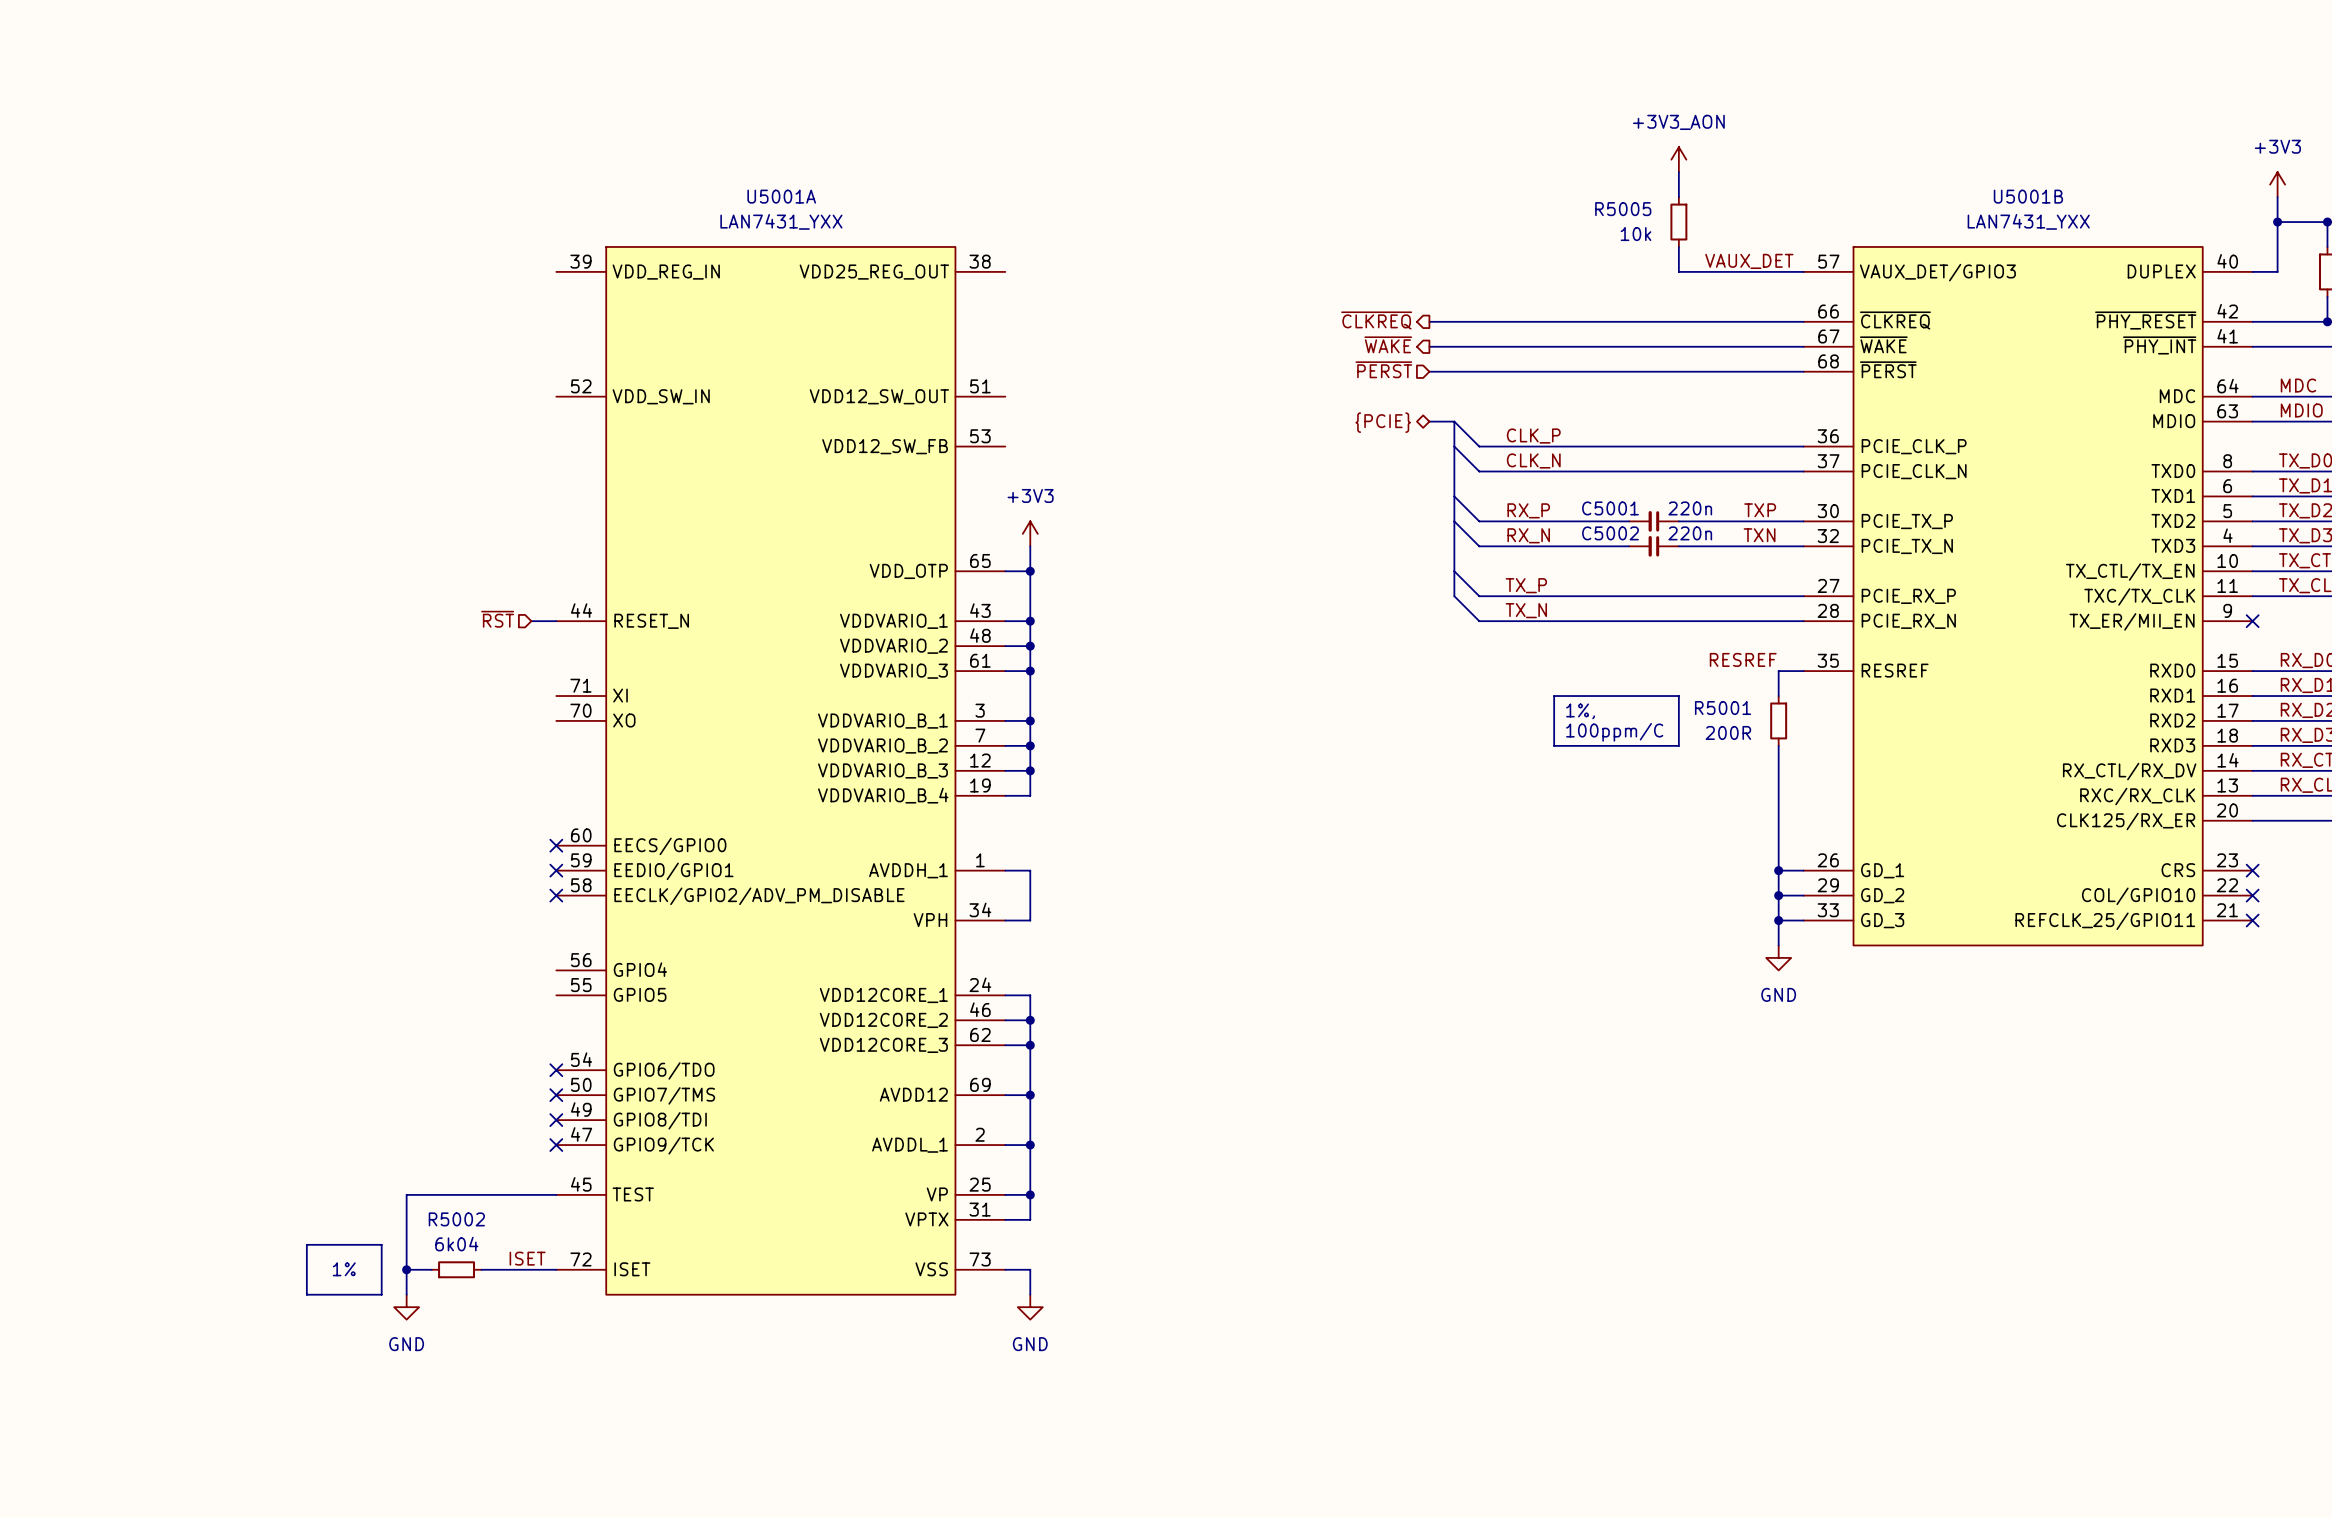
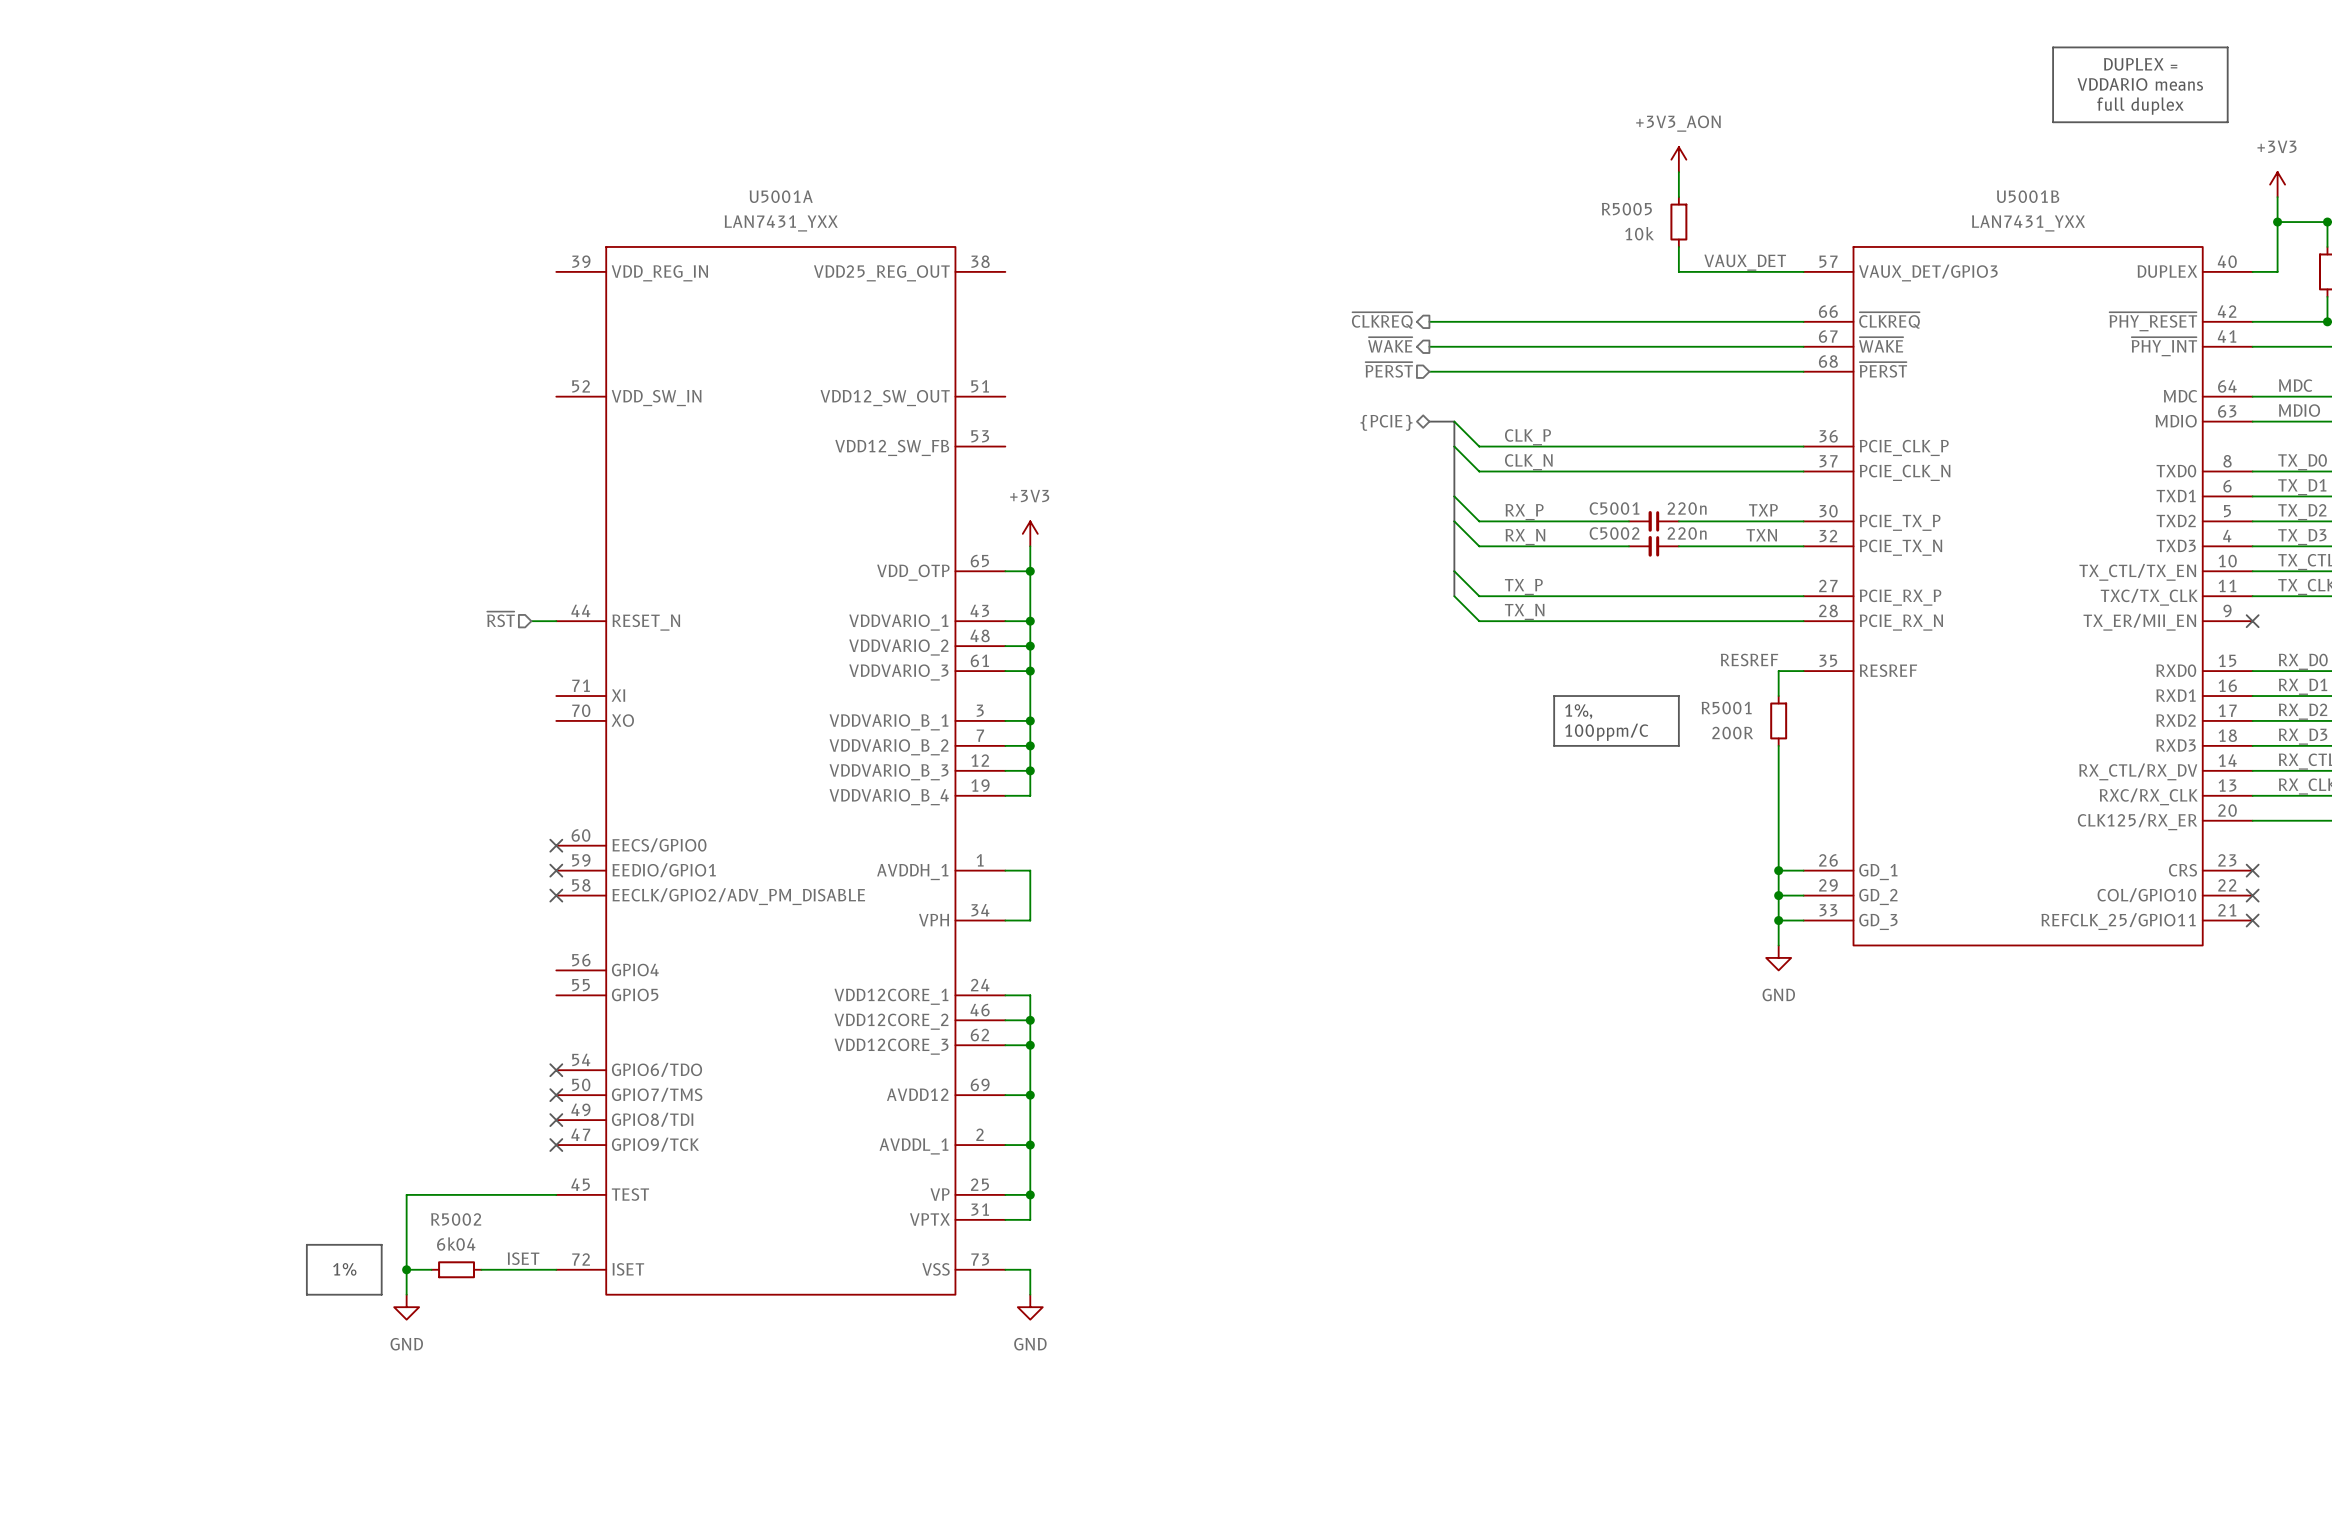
line: none -> (2053, 47) (2227, 47) (2227, 122) (2053, 122) (2053, 47)
text: none -> DUPLEX = (2140, 64)
text: none -> VDDARIO means (2140, 84)
text: none -> full duplex (2140, 106)

